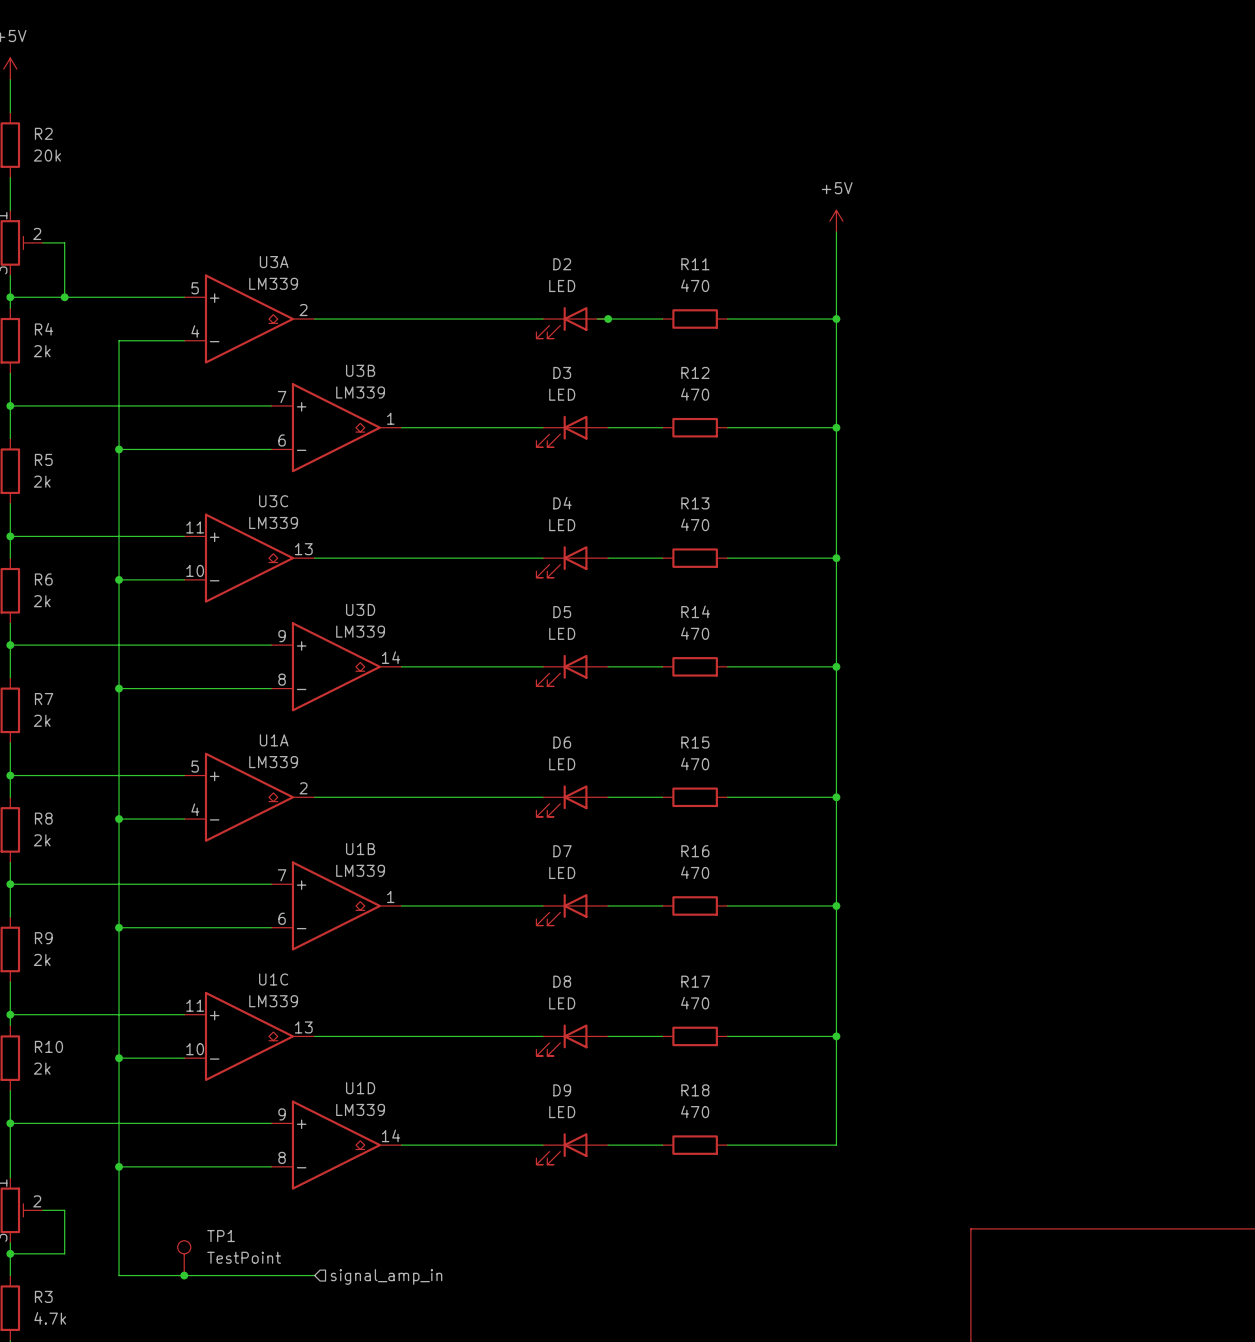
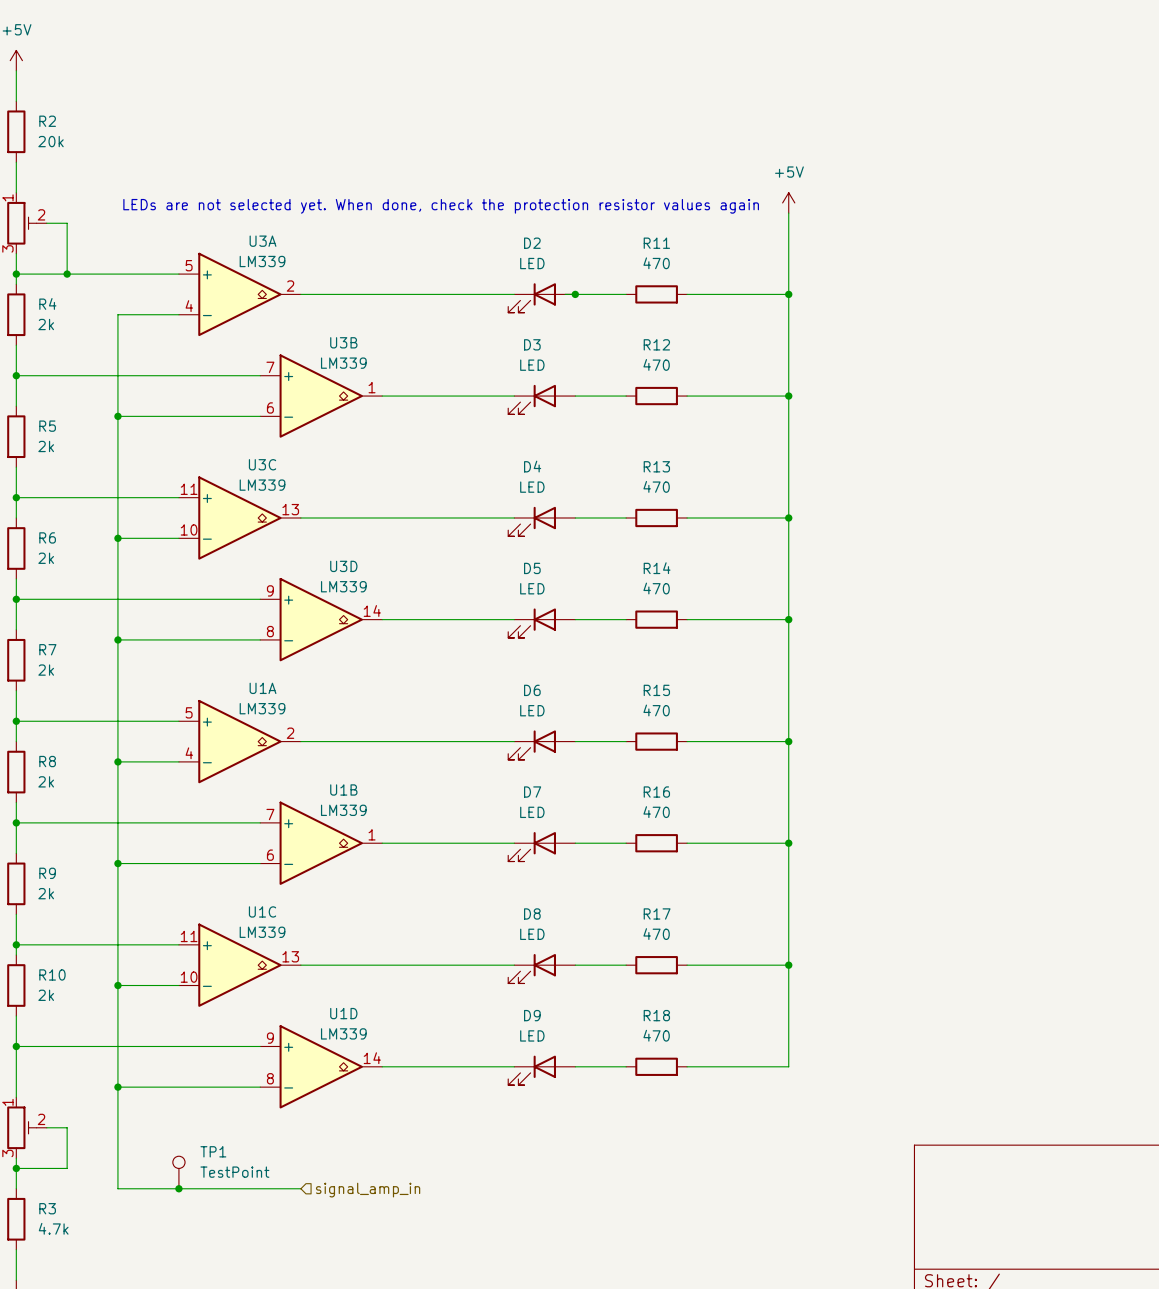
text: none -> LEDs are not selected yet. When done, check the protection resistor values again (441, 206)

